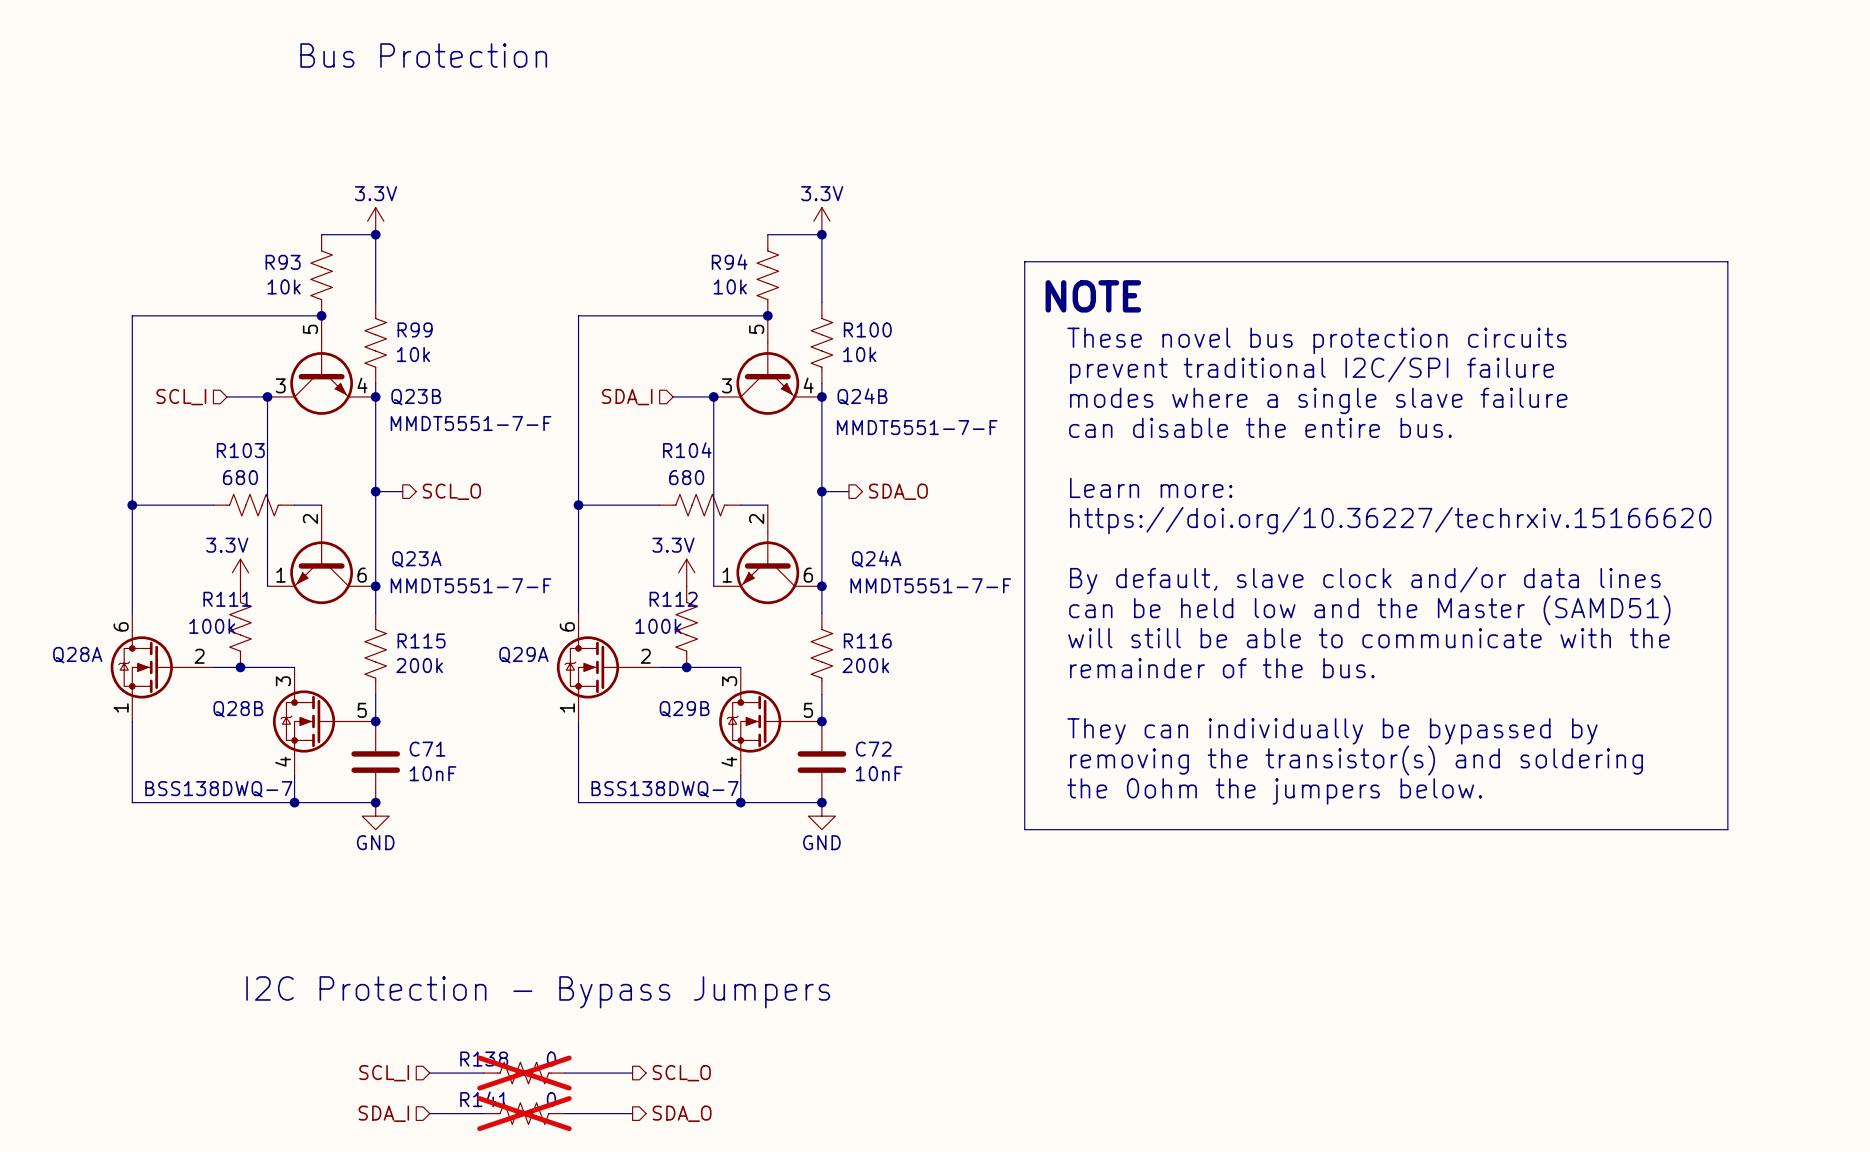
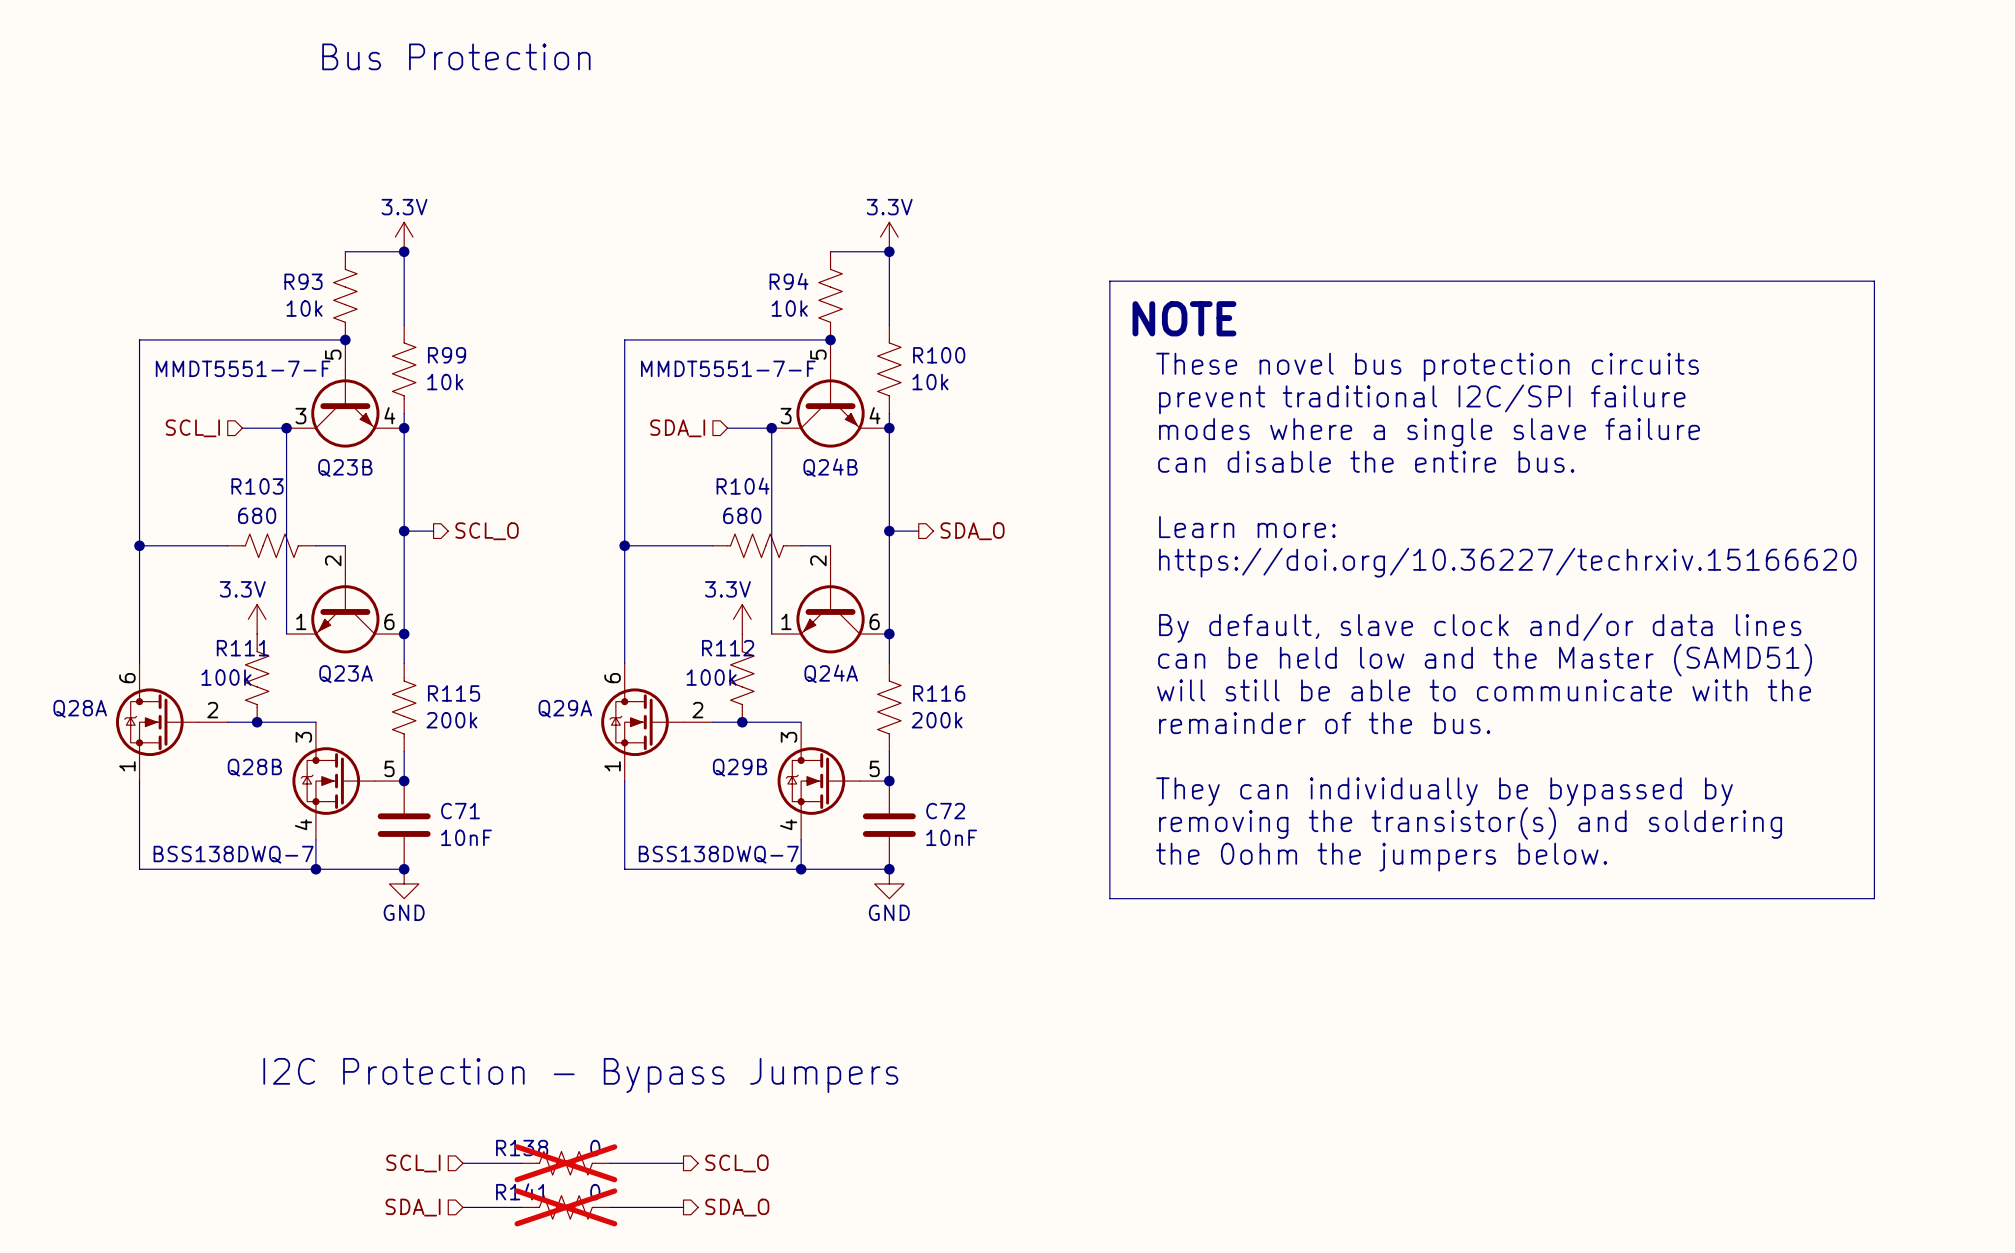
Q24B name position: Q24B (862, 396) -> Q24B (830, 467)
Q23B name position: Q23B (416, 397) -> Q23B (345, 468)
Q23B value position: MMDT5551-7-F (470, 423) -> MMDT5551-7-F (243, 368)
Q24B value position: MMDT5551-7-F (917, 427) -> MMDT5551-7-F (728, 368)
Q23A name position: Q23A (416, 559) -> Q23A (346, 674)
Q24A name position: Q24A (876, 559) -> Q24A (831, 673)
Q23A value: MMDT5551-7-F (470, 585) -> none
Q24A value: MMDT5551-7-F (930, 585) -> none

